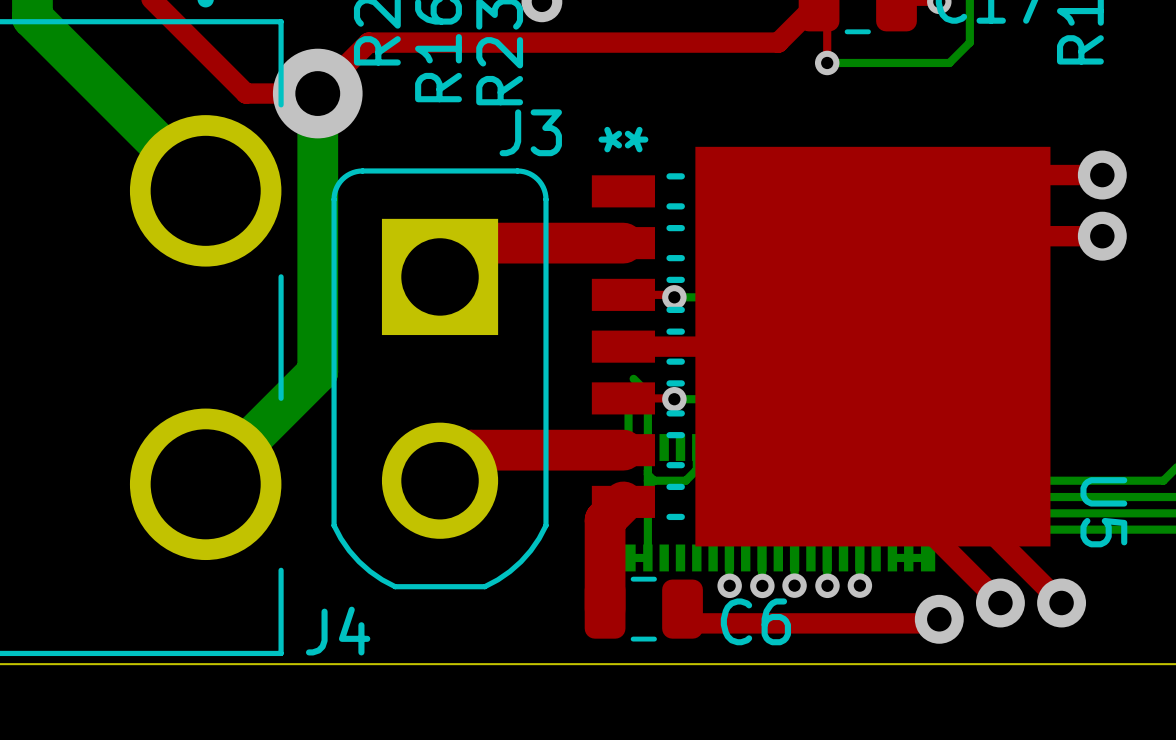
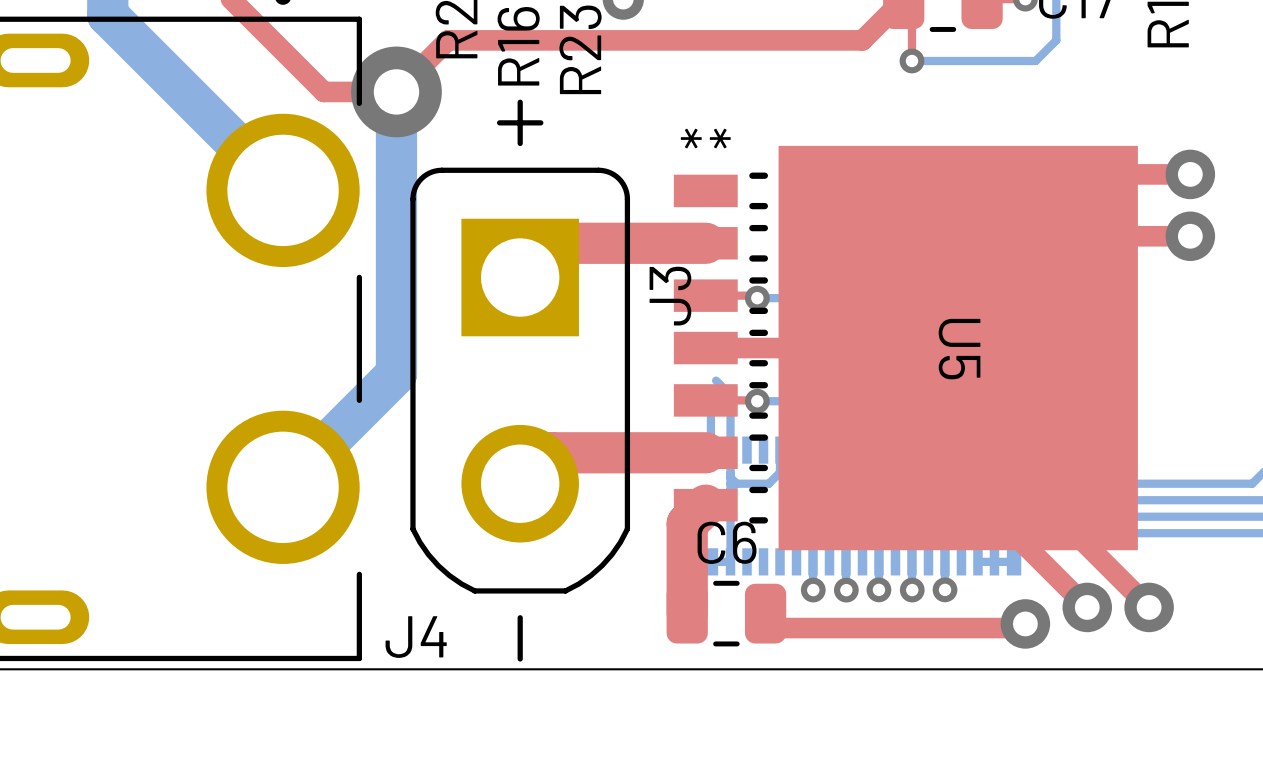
J3 name position: J3 (530, 132) -> J3 (670, 296)
J3 footprint: [331, 168, 549, 590] -> [410, 99, 631, 662]
U5 name position: U5 (1103, 512) -> U5 (959, 349)
C6 name position: C6 (755, 621) -> C6 (727, 542)

